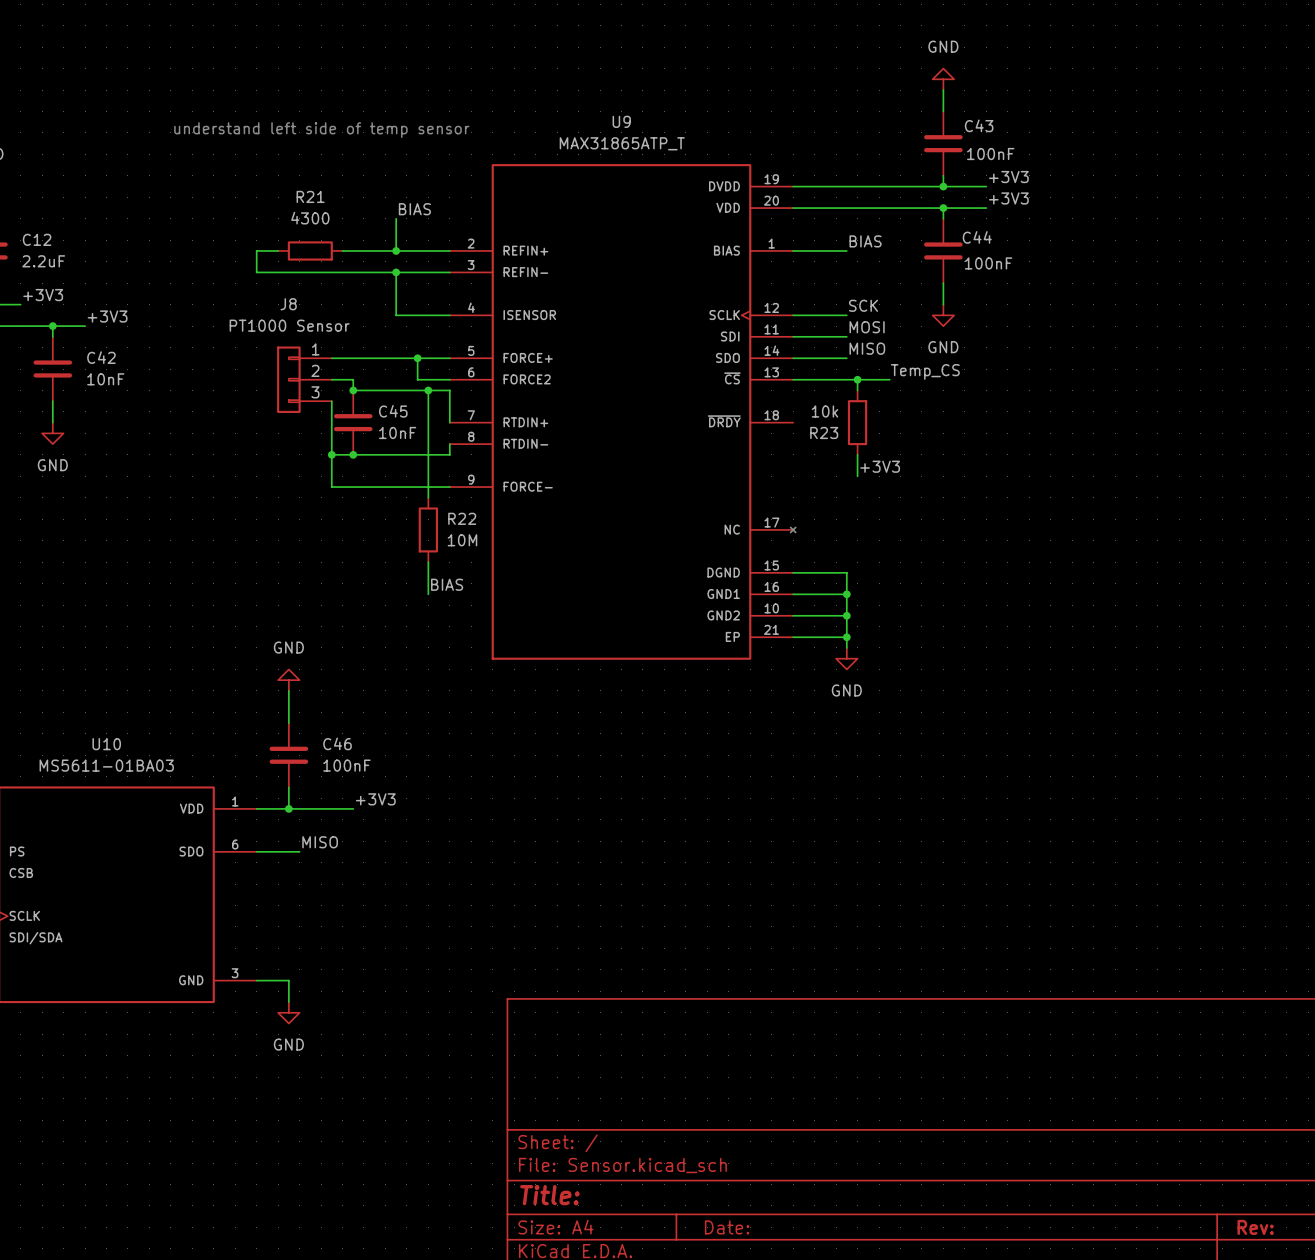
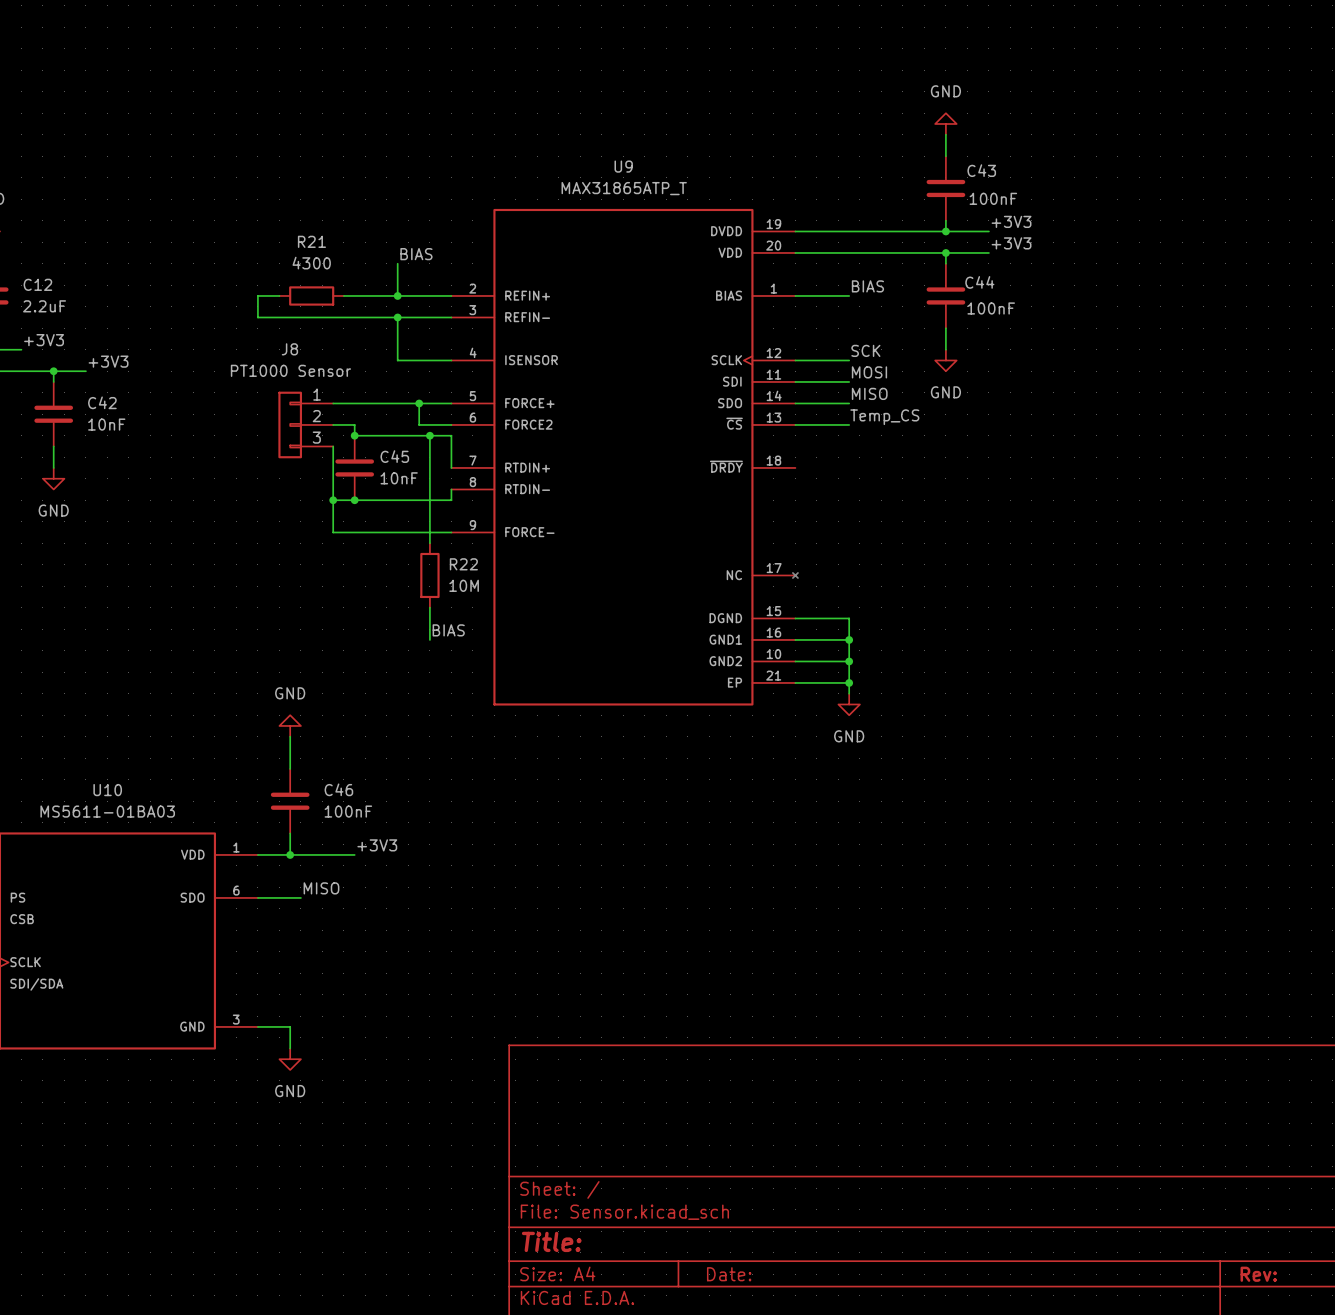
text: understand left side of temp sensor (321, 130) -> none
label position: Temp_CS (925, 371) -> Temp_CS (884, 417)
wire: (846, 379) (889, 379) -> none
wire: (857, 379) (857, 390) -> none
junction: (857, 379) -> none
R23: 10k (857, 422) -> none
wire: (857, 454) (857, 476) -> none
label: +3V3 (880, 466) -> none

